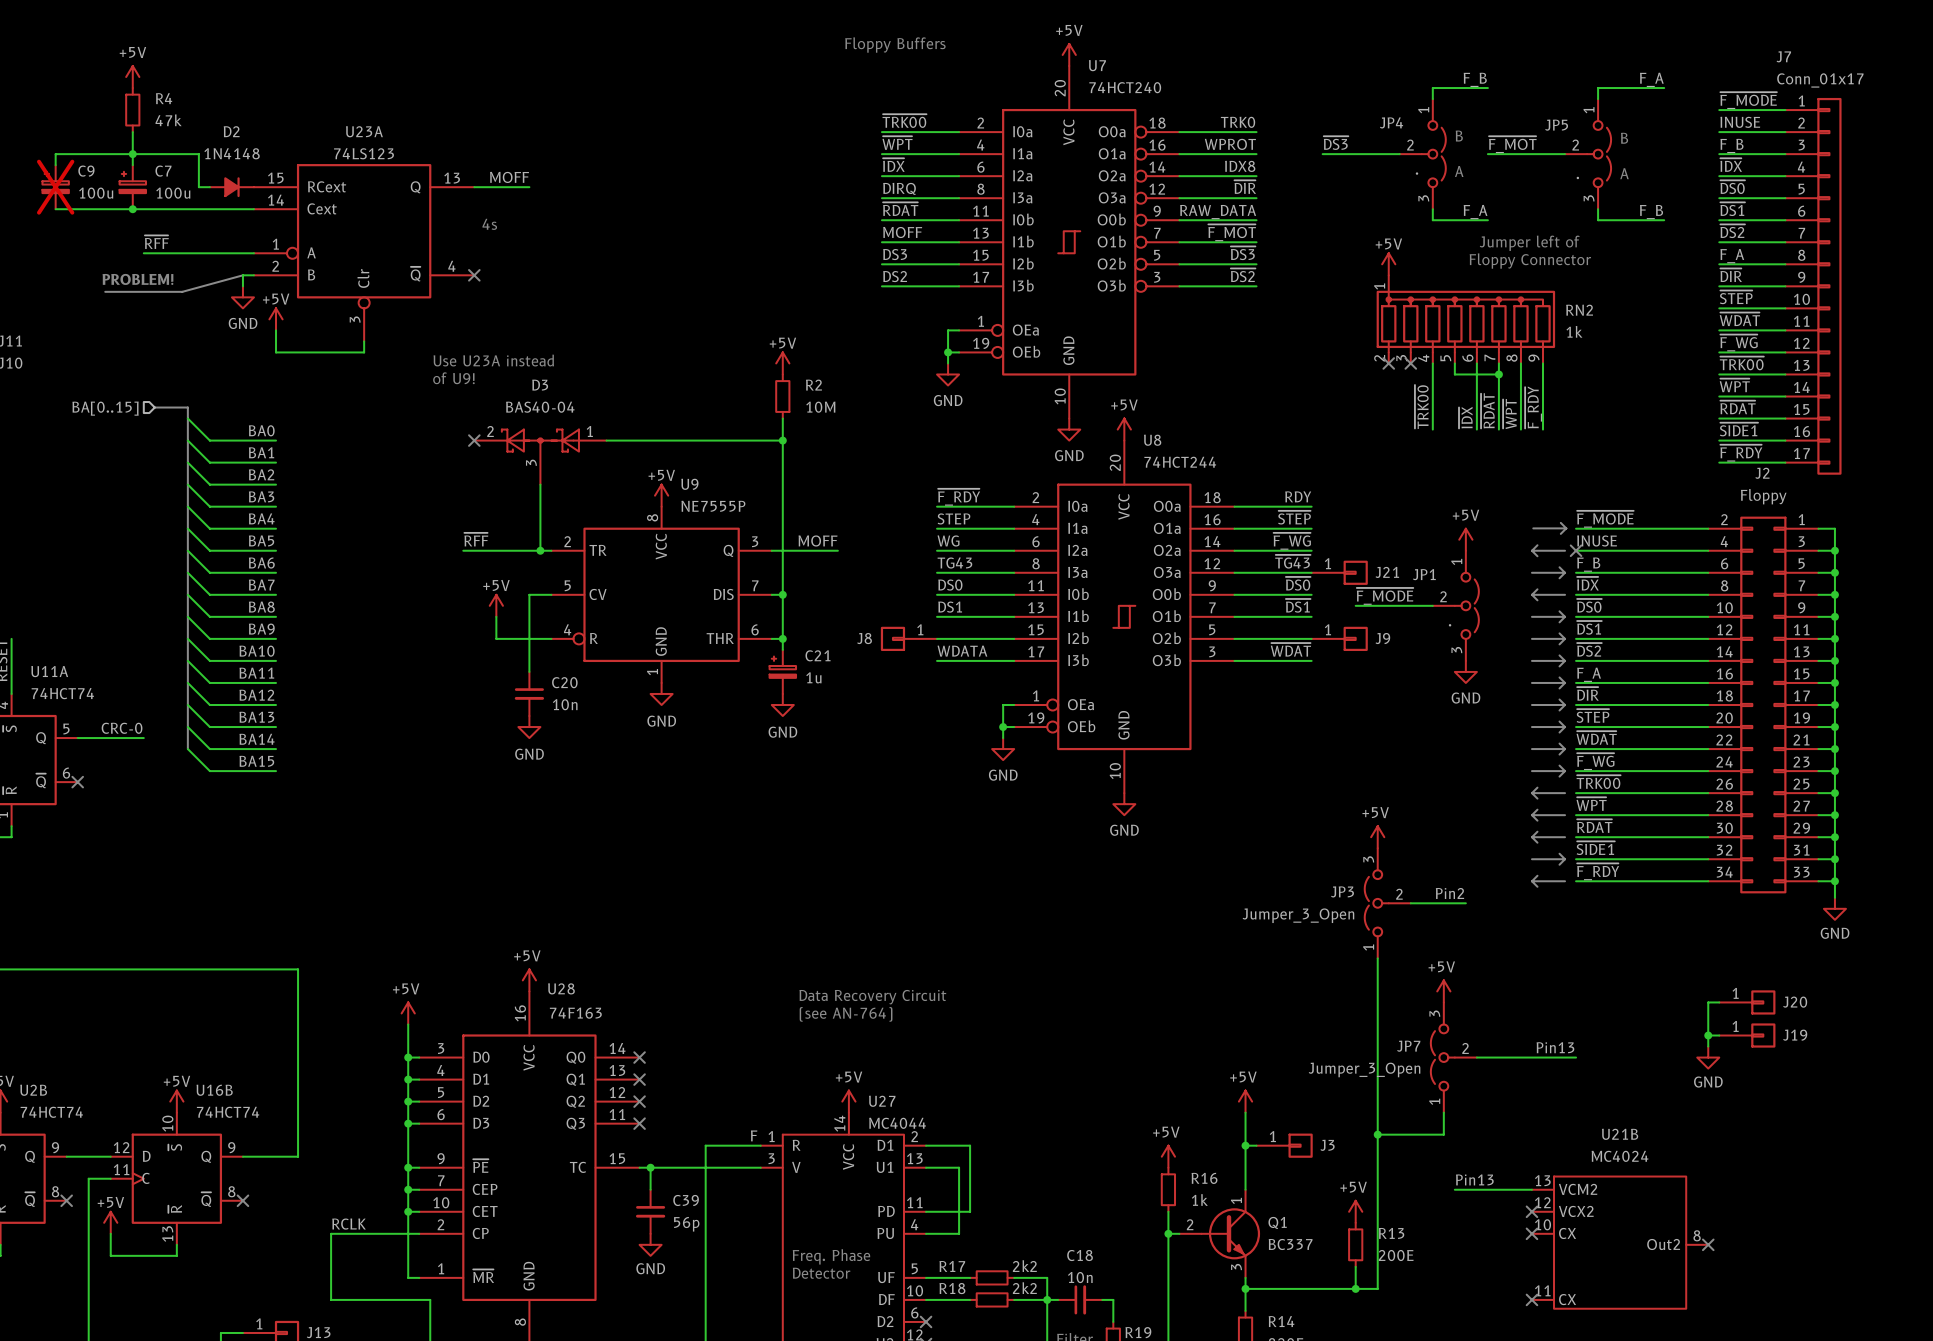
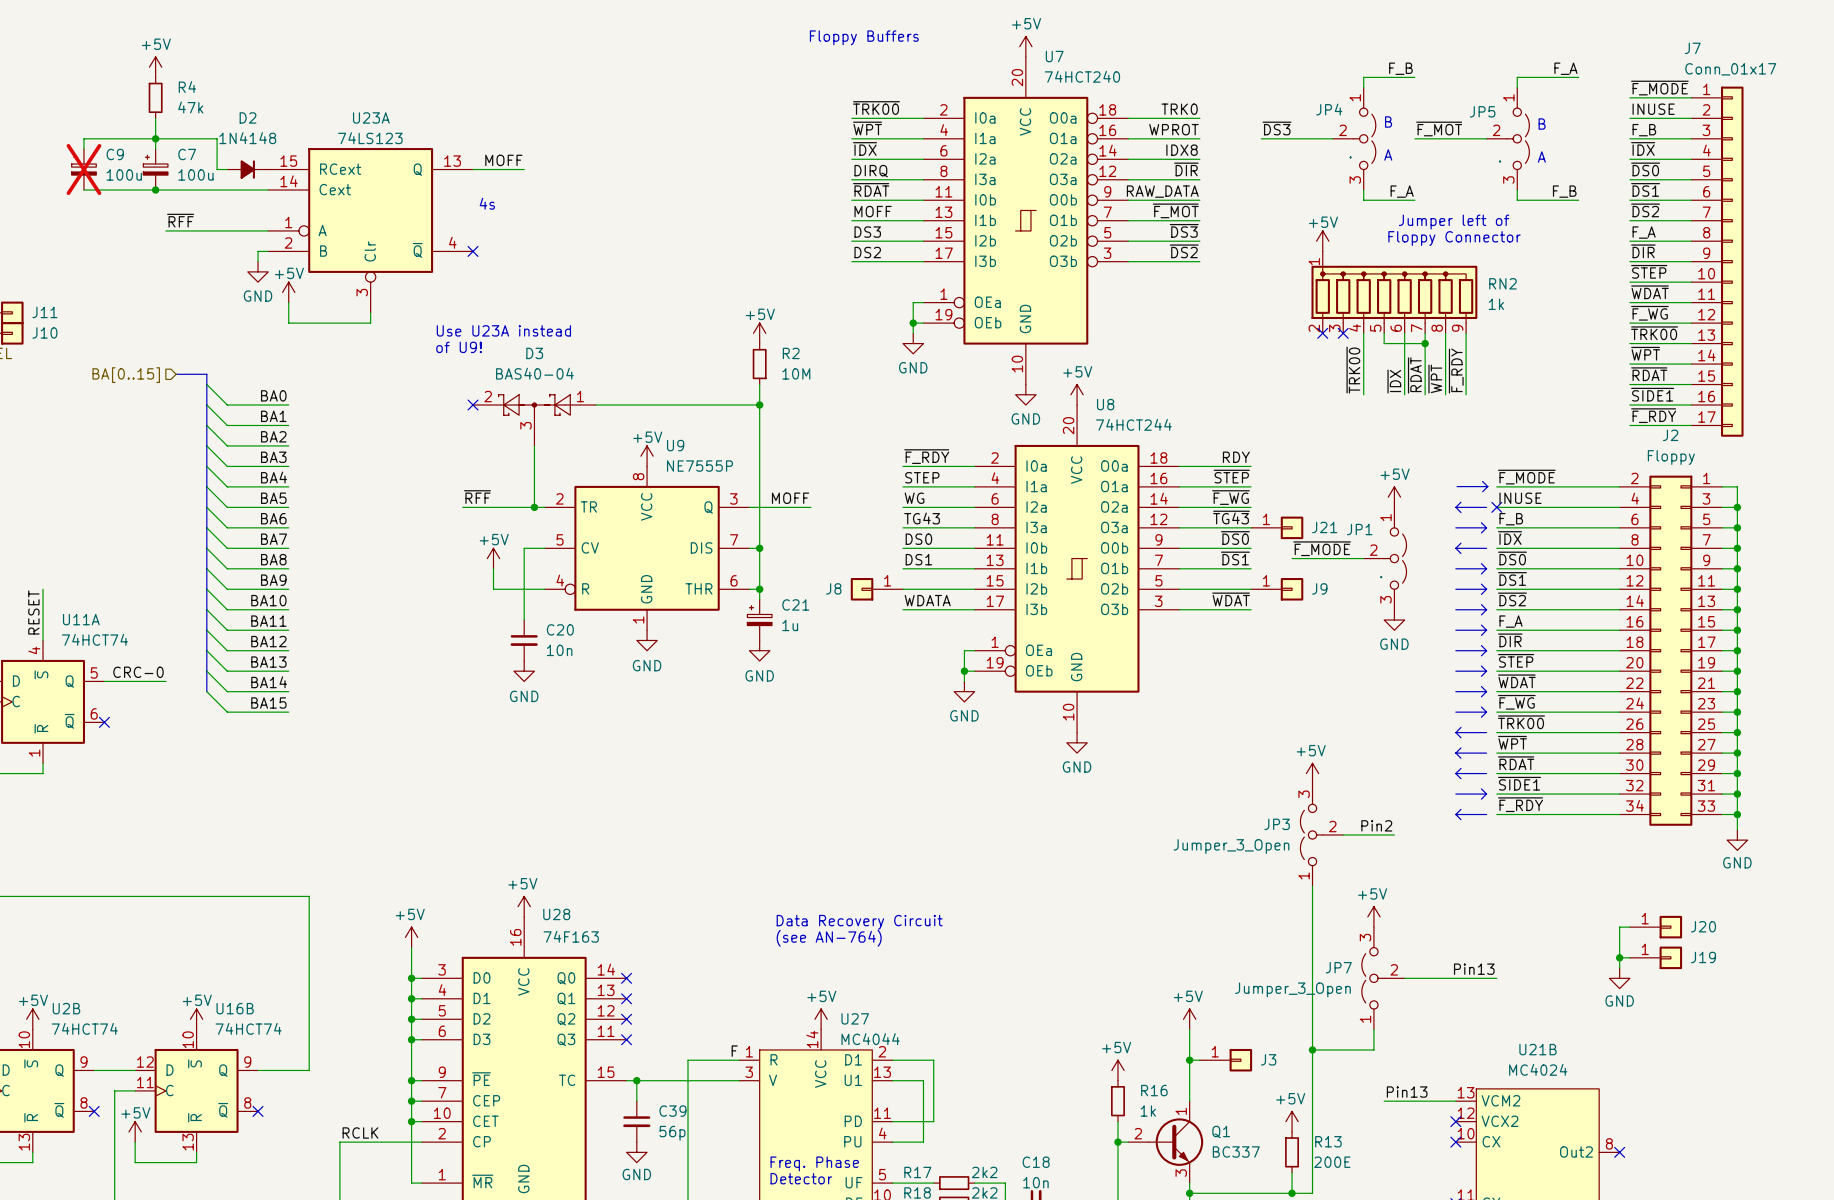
line: (242, 275) (182, 291) (105, 291) -> none
text: PROBLEM! (137, 279) -> none

